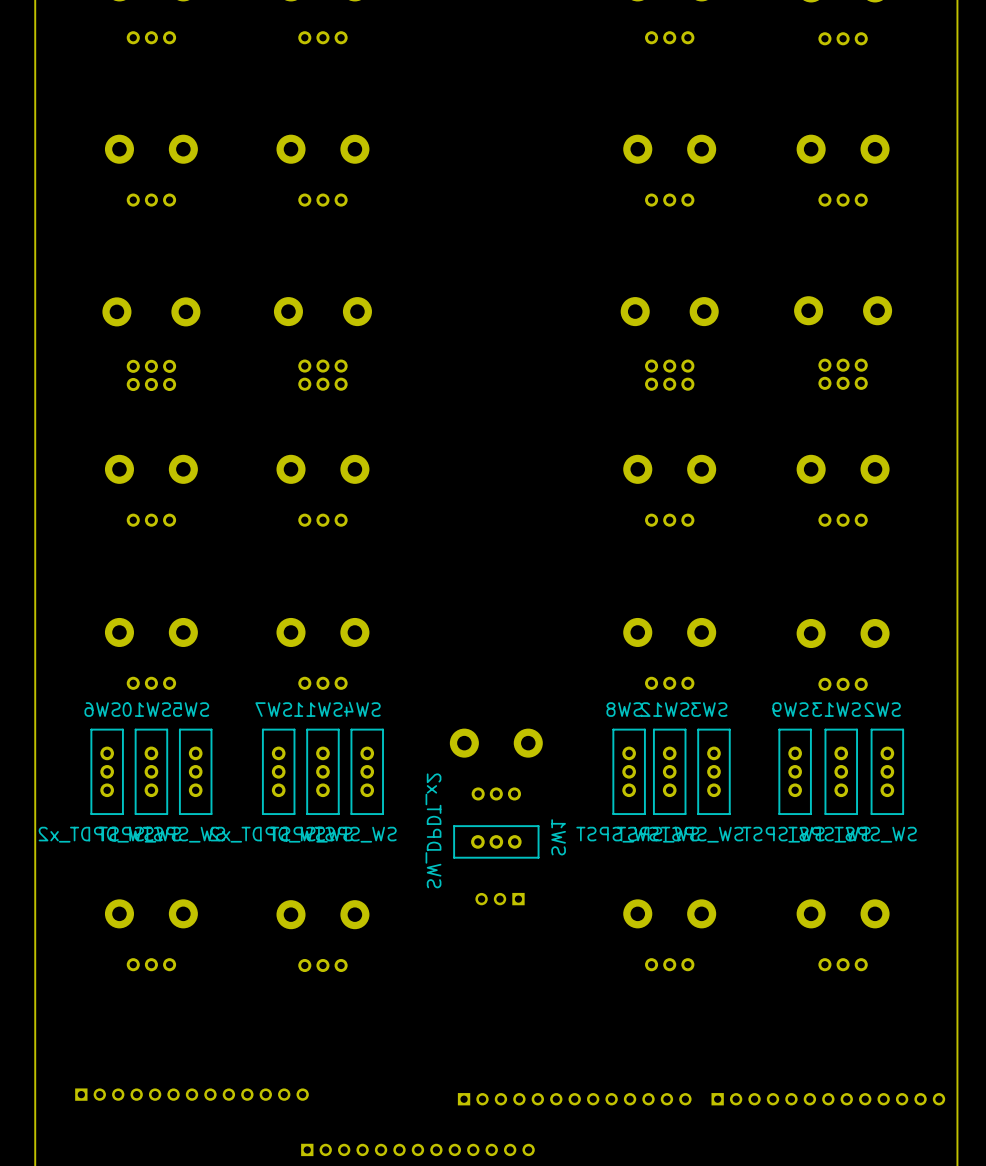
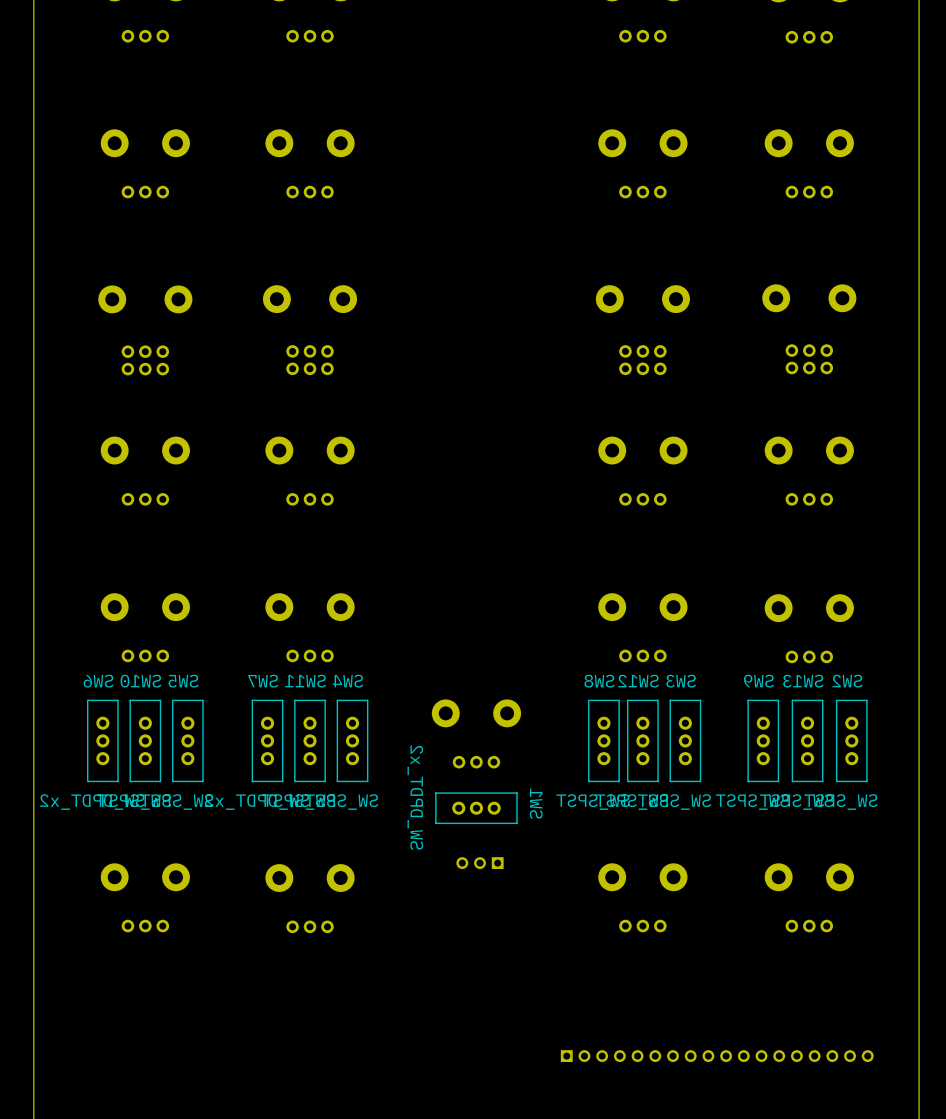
part: (192, 1094) -> none
part: (574, 1099) -> none
part: (828, 1099) -> none
part: none -> (717, 1056)
part: (417, 1149) -> none

